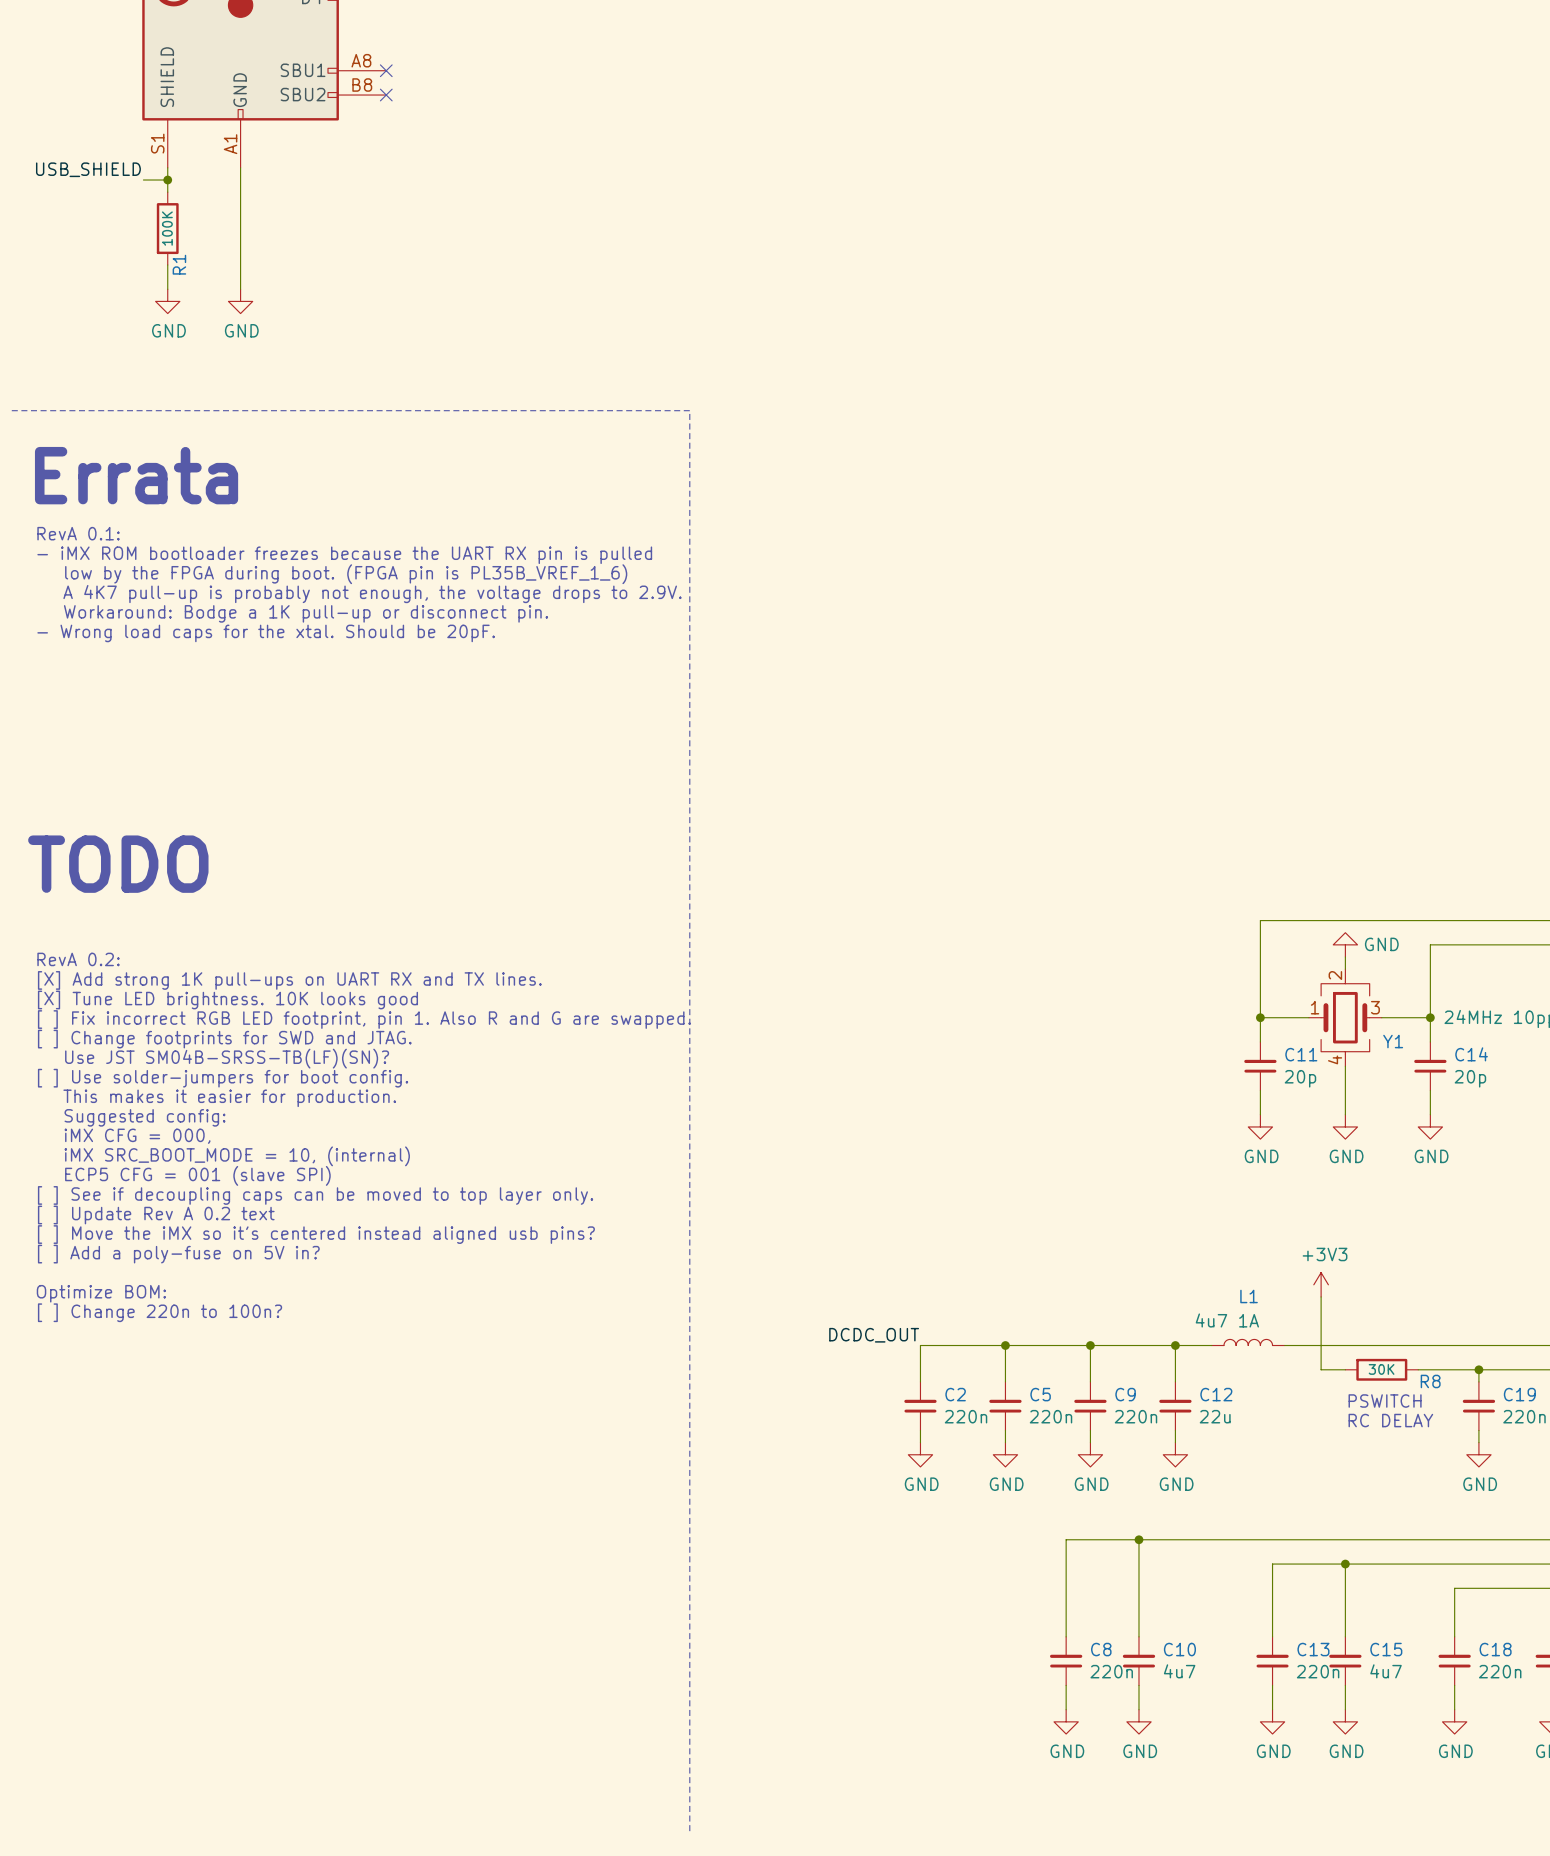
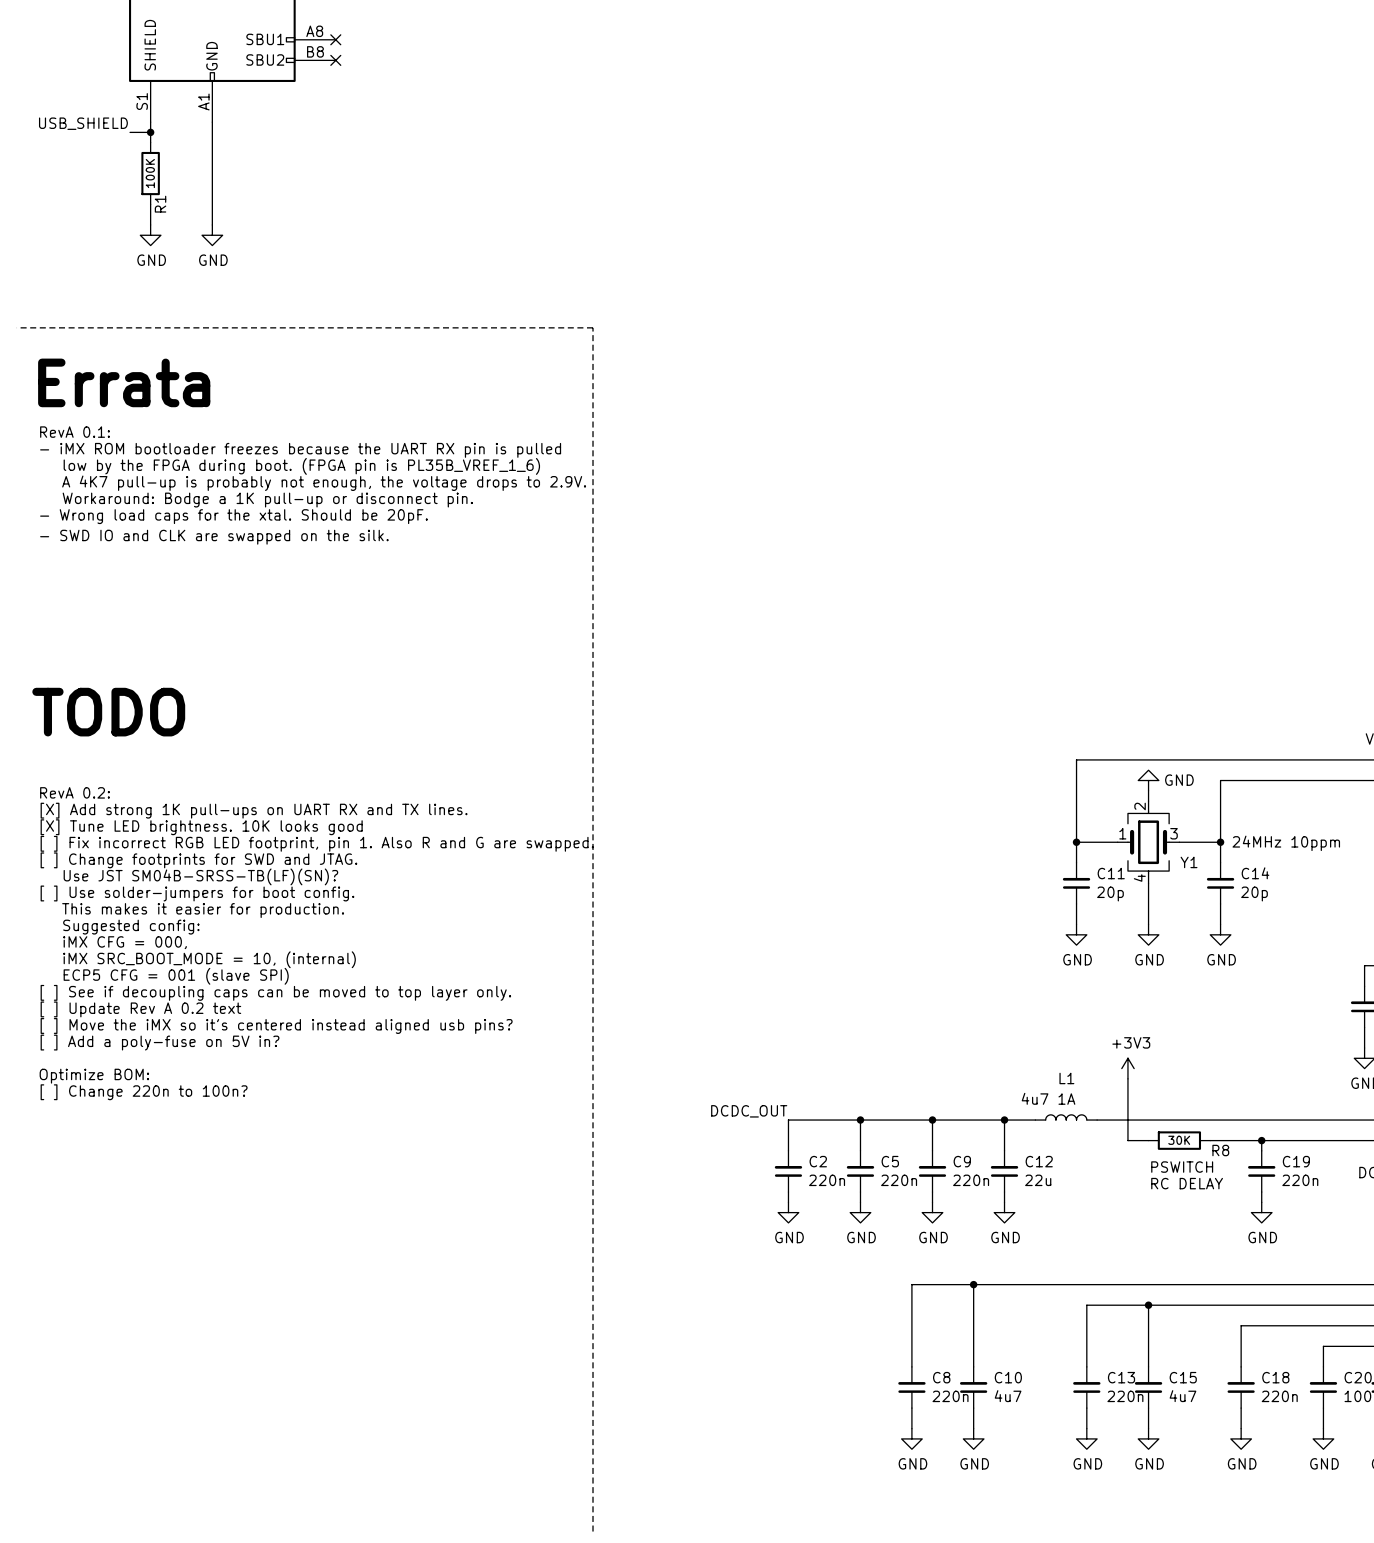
text: none -> - SWD IO and CLK are swapped on the silk. (214, 537)

